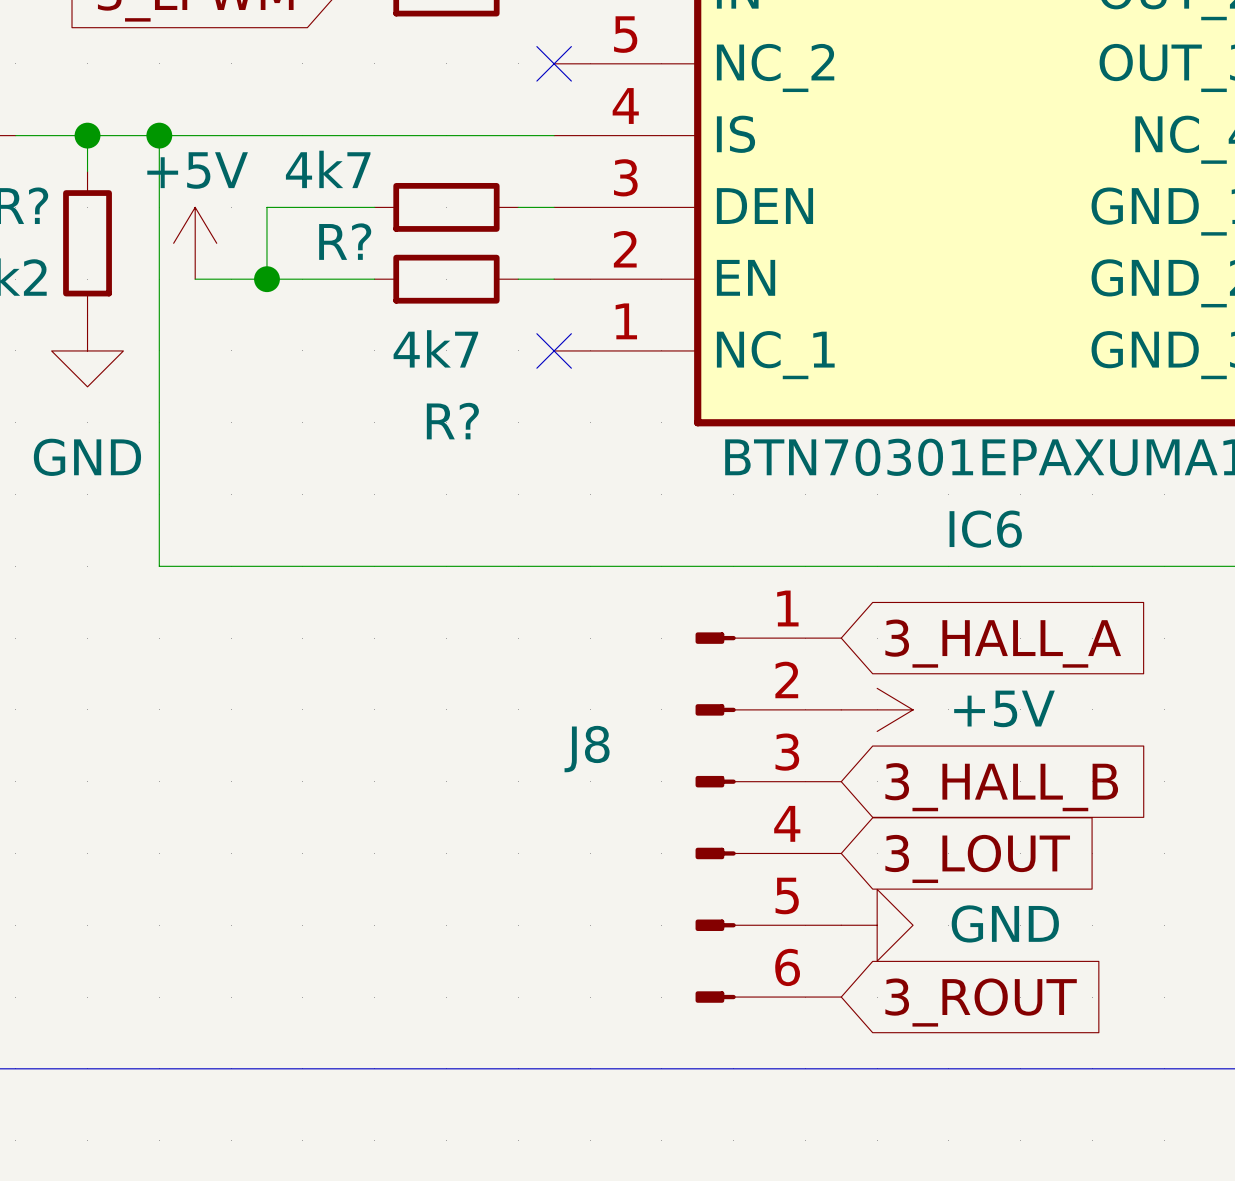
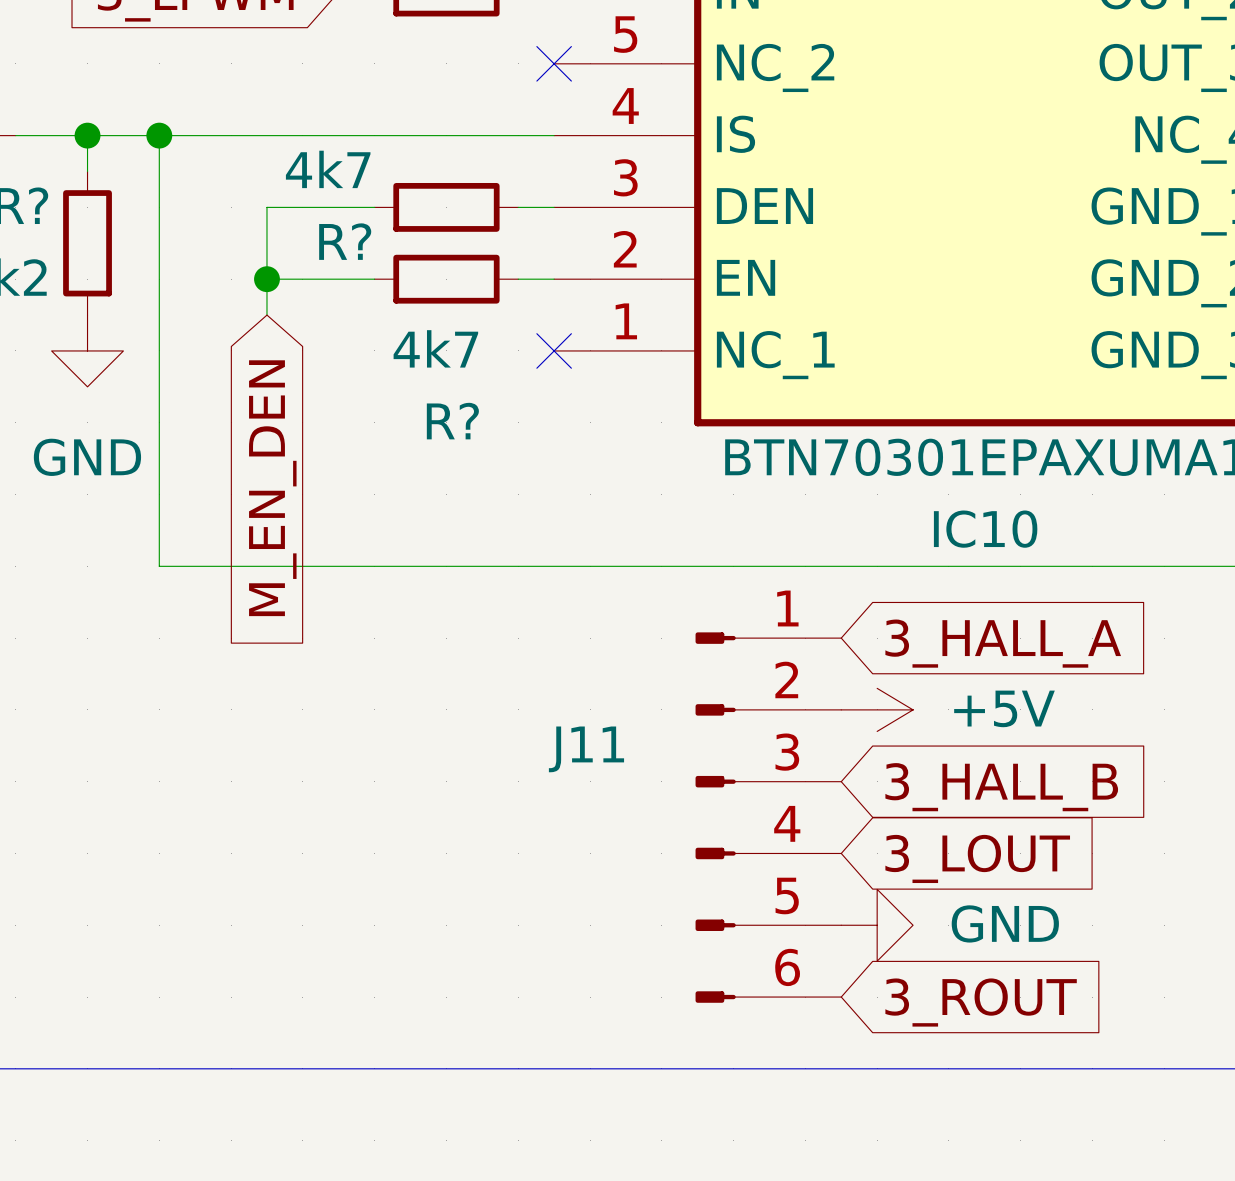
power symbol: +5V (195, 243) -> none
wire: (195, 279) (266, 279) -> (266, 315) (266, 279)
global label: none -> M_EN_DEN (272, 488)
IC6 name: IC6 (985, 529) -> IC10 (985, 529)
J8 name: J8 (587, 749) -> J11 (586, 749)

